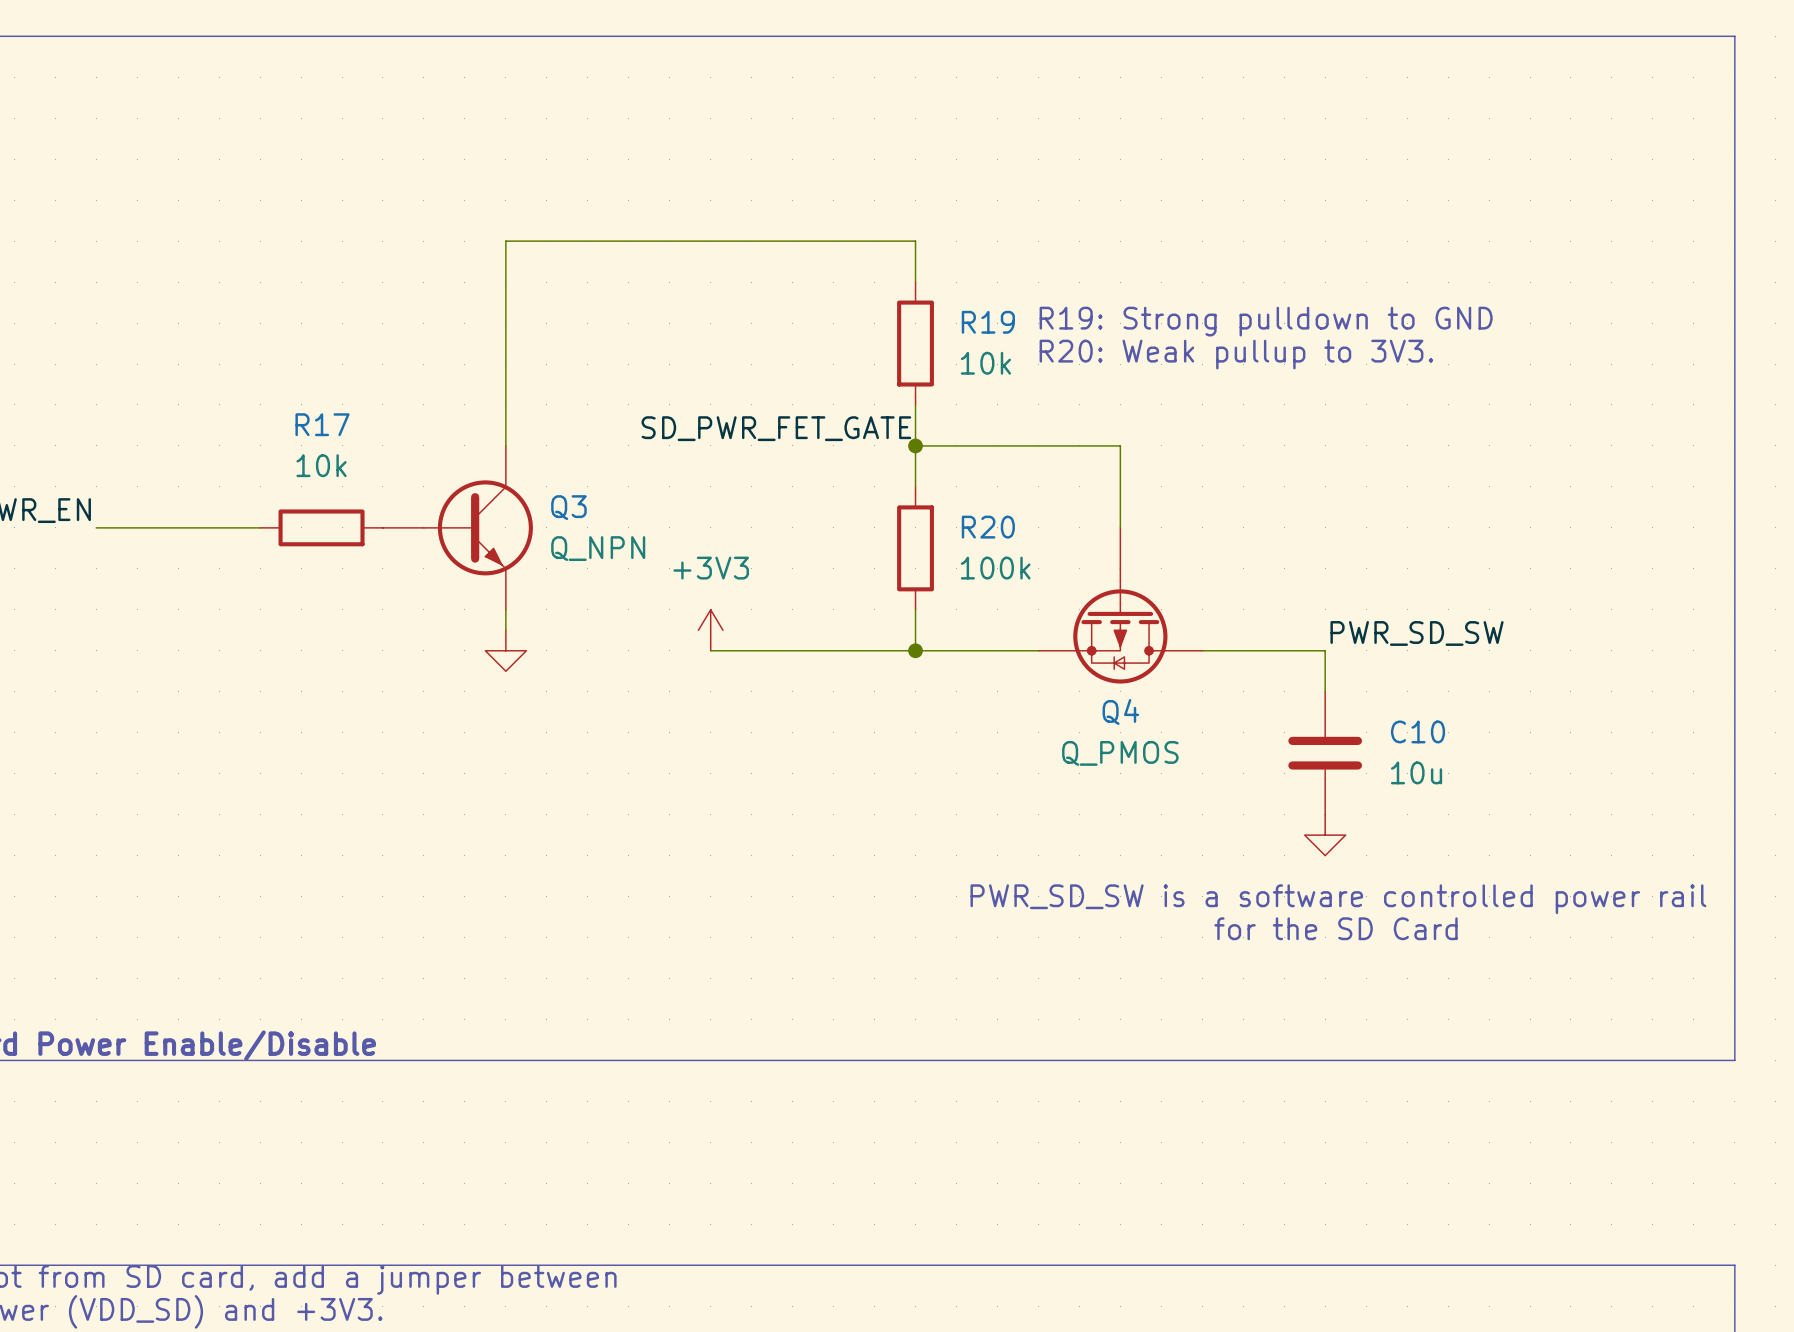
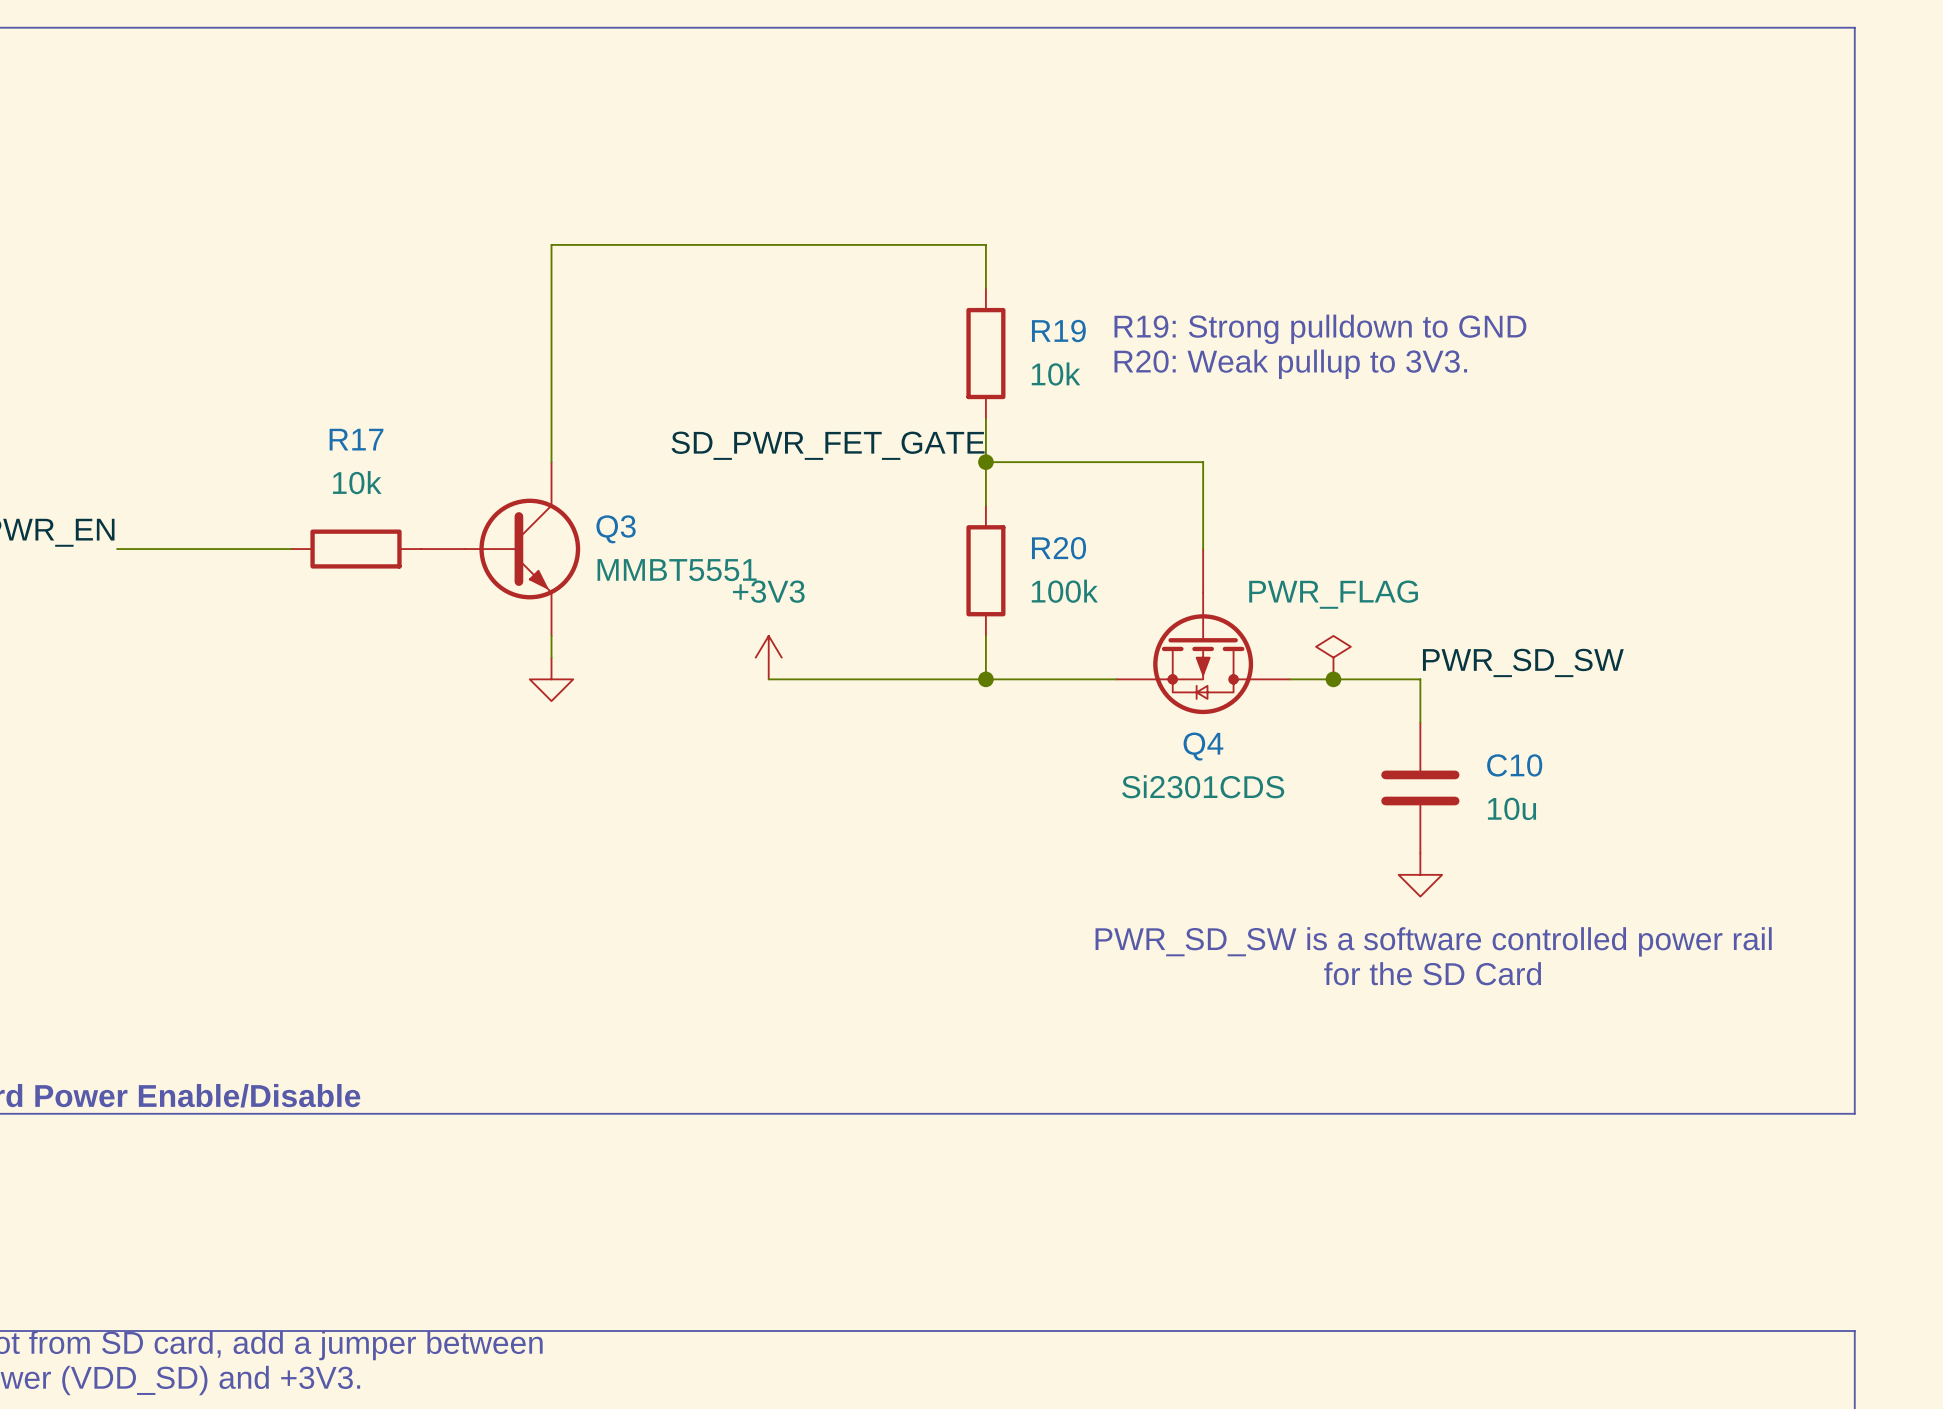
Q3 value: Q_NPN (598, 548) -> MMBT5551 (677, 570)
power symbol: none -> PWR_FLAG (1333, 657)
junction: none -> (1333, 679)
Q4 value: Q_PMOS (1120, 753) -> Si2301CDS (1203, 786)

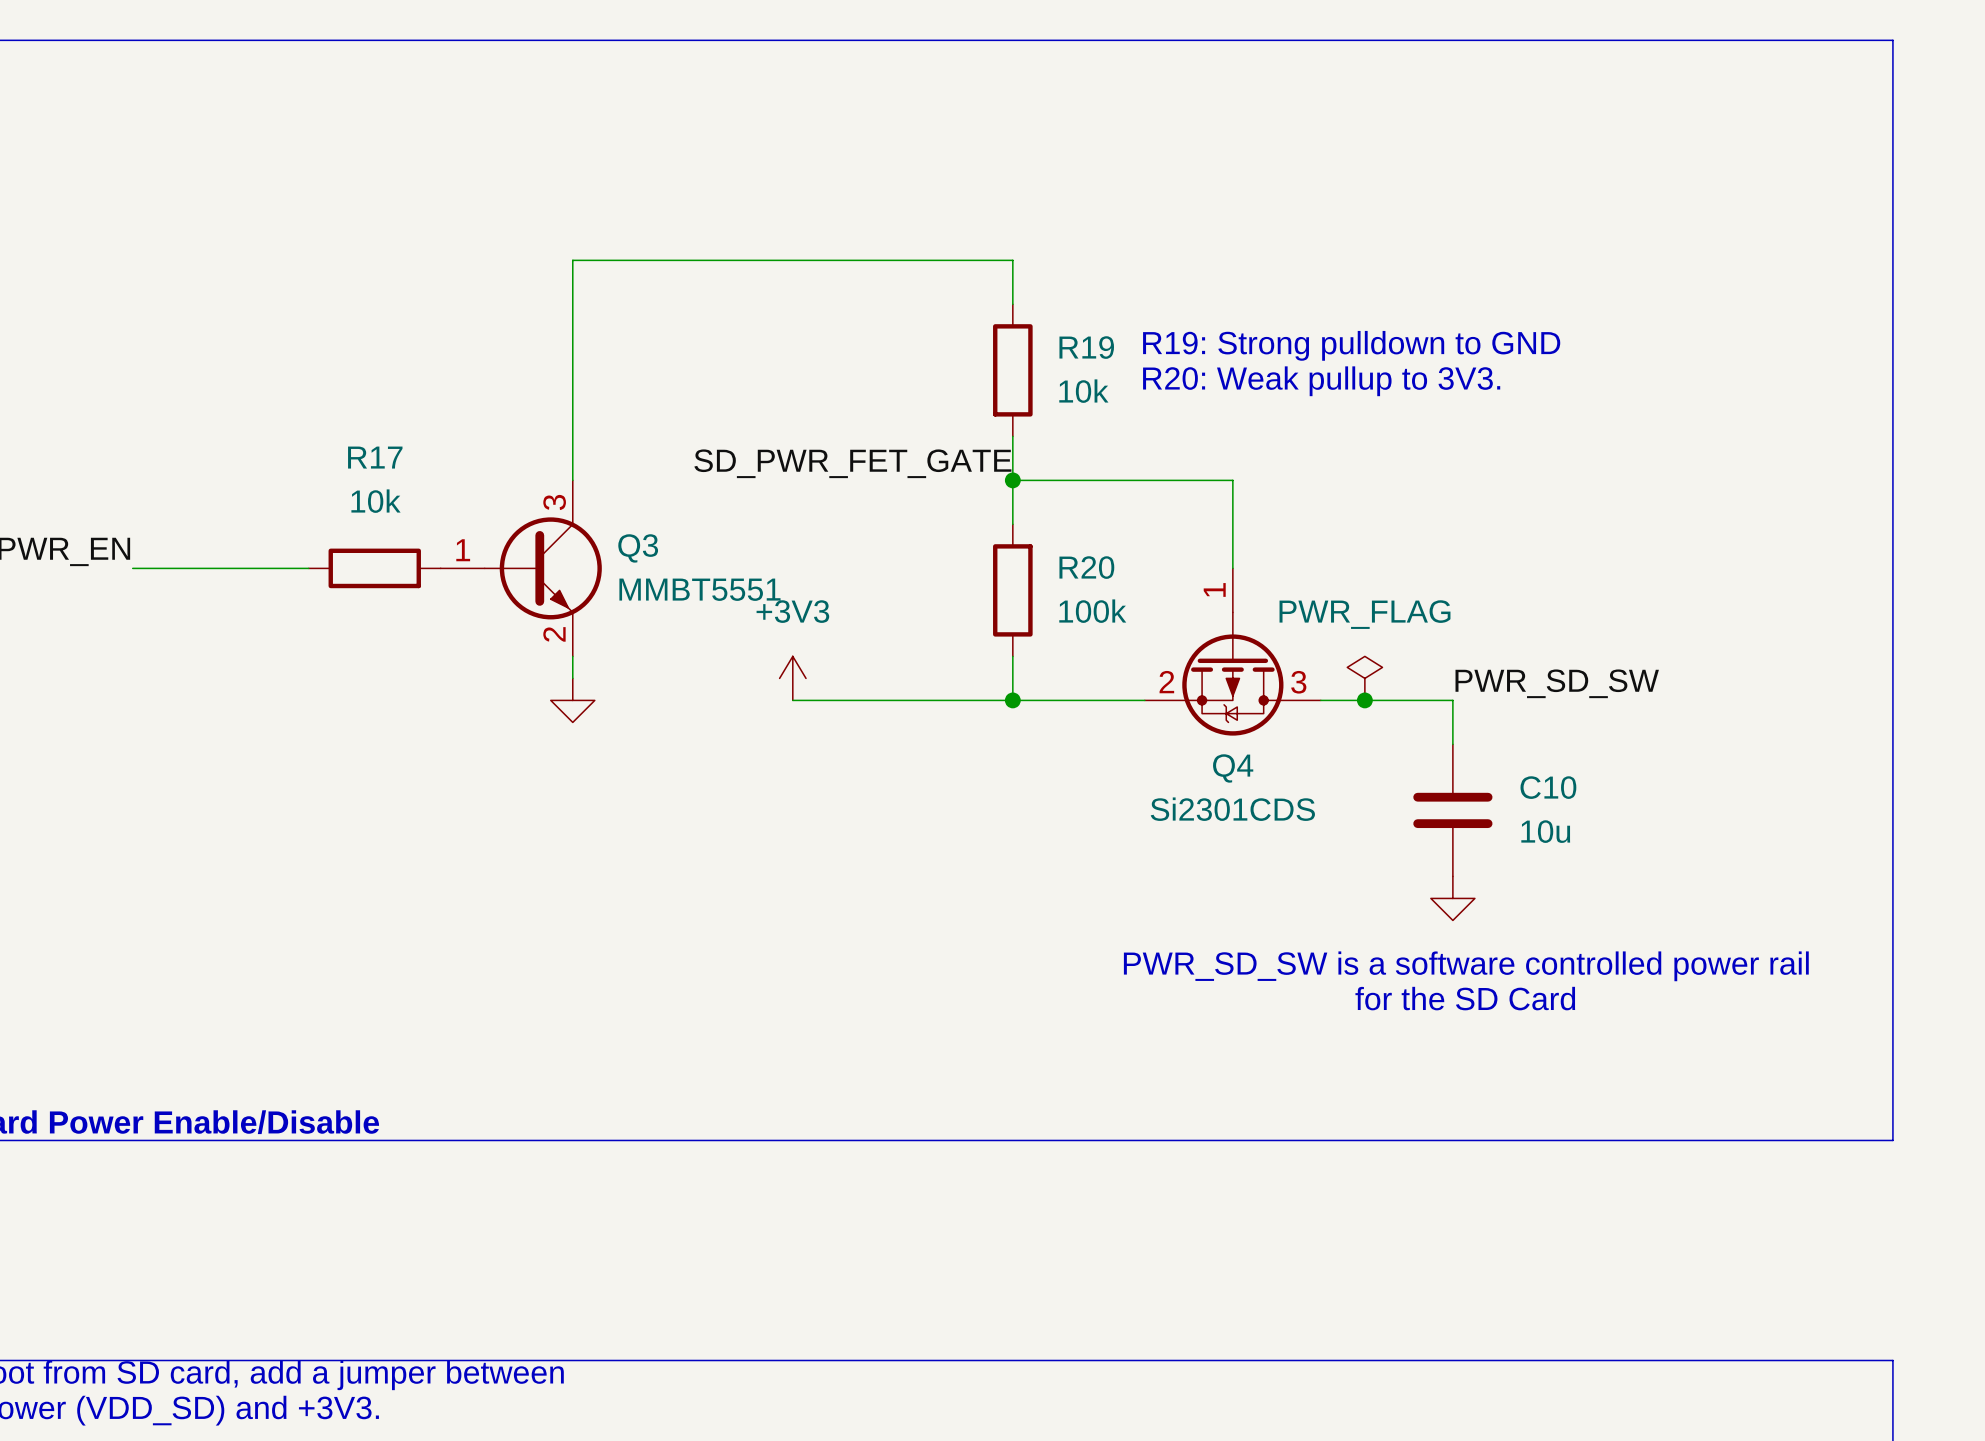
Q3 pin number: none -> 3 (554, 502)
Q3 pin number: none -> 1 (463, 550)
Q4 symbol: [1116, 549, 1291, 715] -> [1144, 568, 1321, 736]
Q3 pin number: none -> 2 (554, 634)

